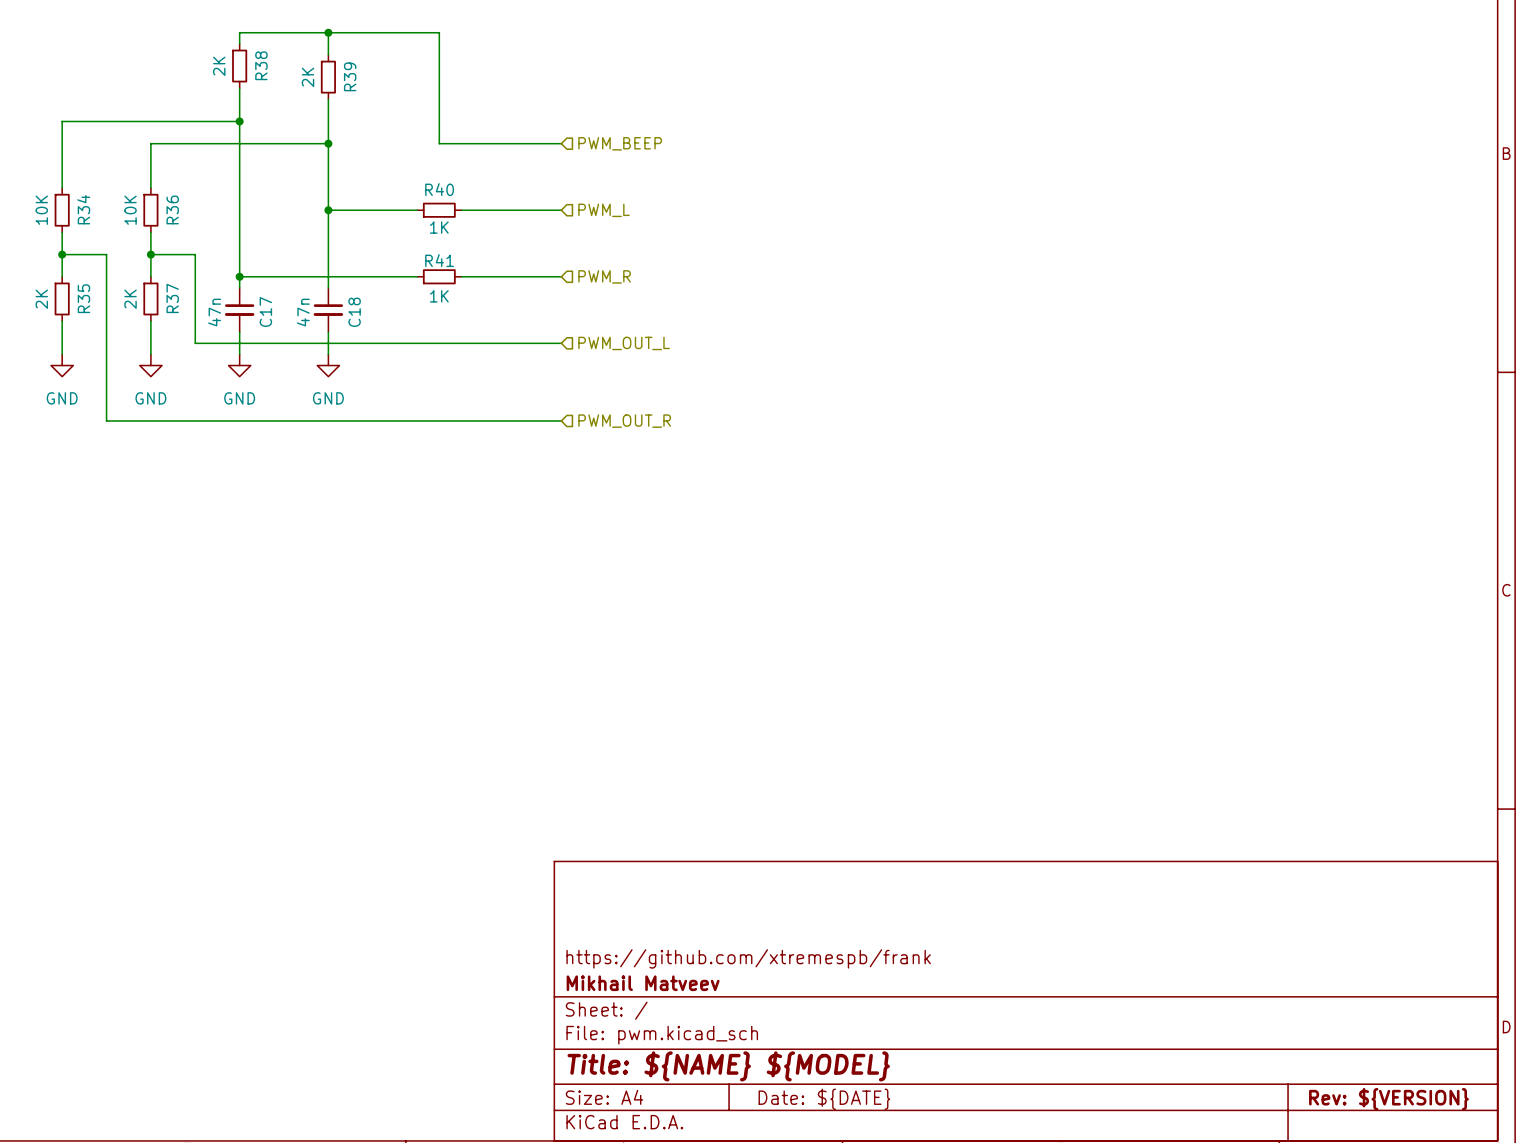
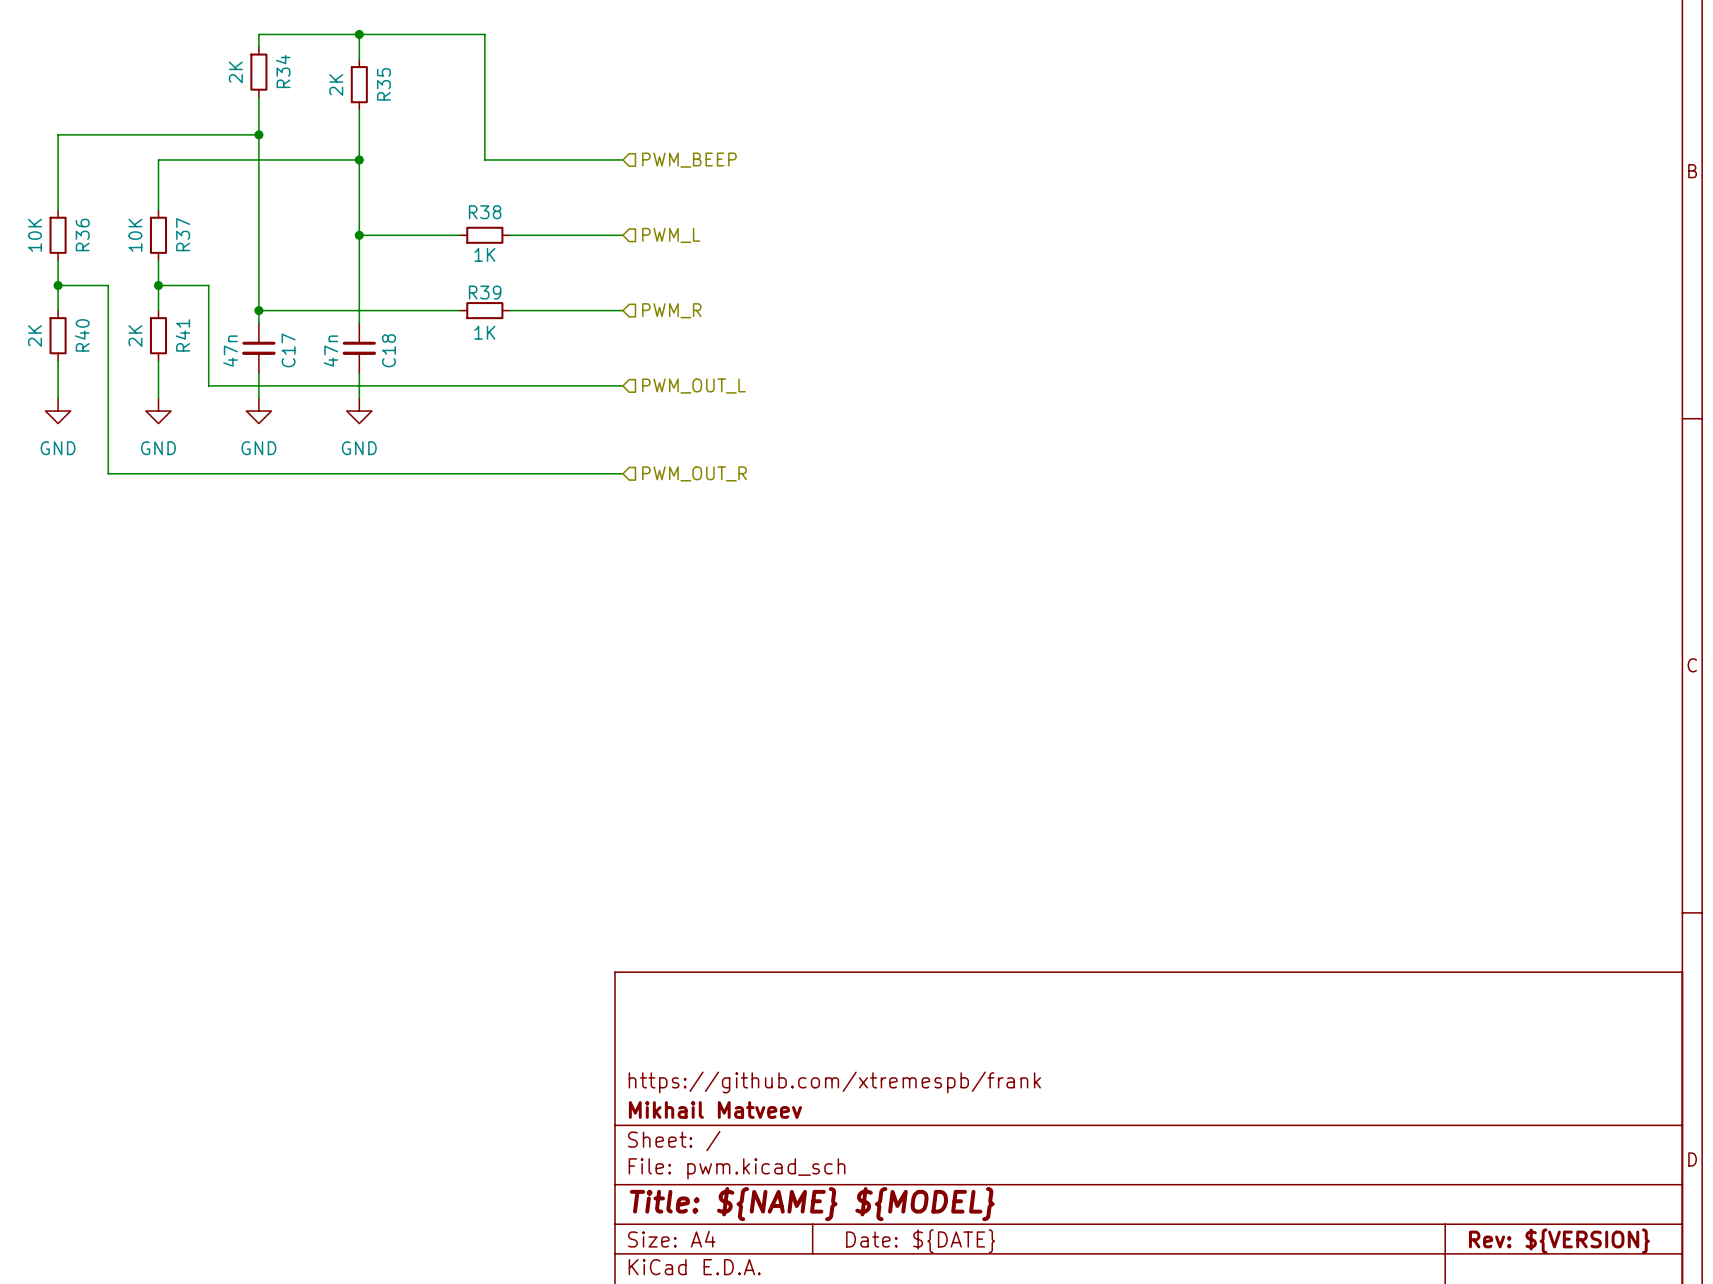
R38 name: R38 (261, 65) -> R34 (283, 71)
R39 name: R39 (350, 76) -> R35 (383, 84)
R40 name: R40 (439, 189) -> R38 (485, 212)
R34 name: R34 (83, 209) -> R36 (82, 234)
R36 name: R36 (172, 209) -> R37 (183, 234)
R41 name: R41 (439, 260) -> R39 (485, 292)
R35 name: R35 (83, 298) -> R40 (82, 335)
R37 name: R37 (172, 298) -> R41 (182, 335)

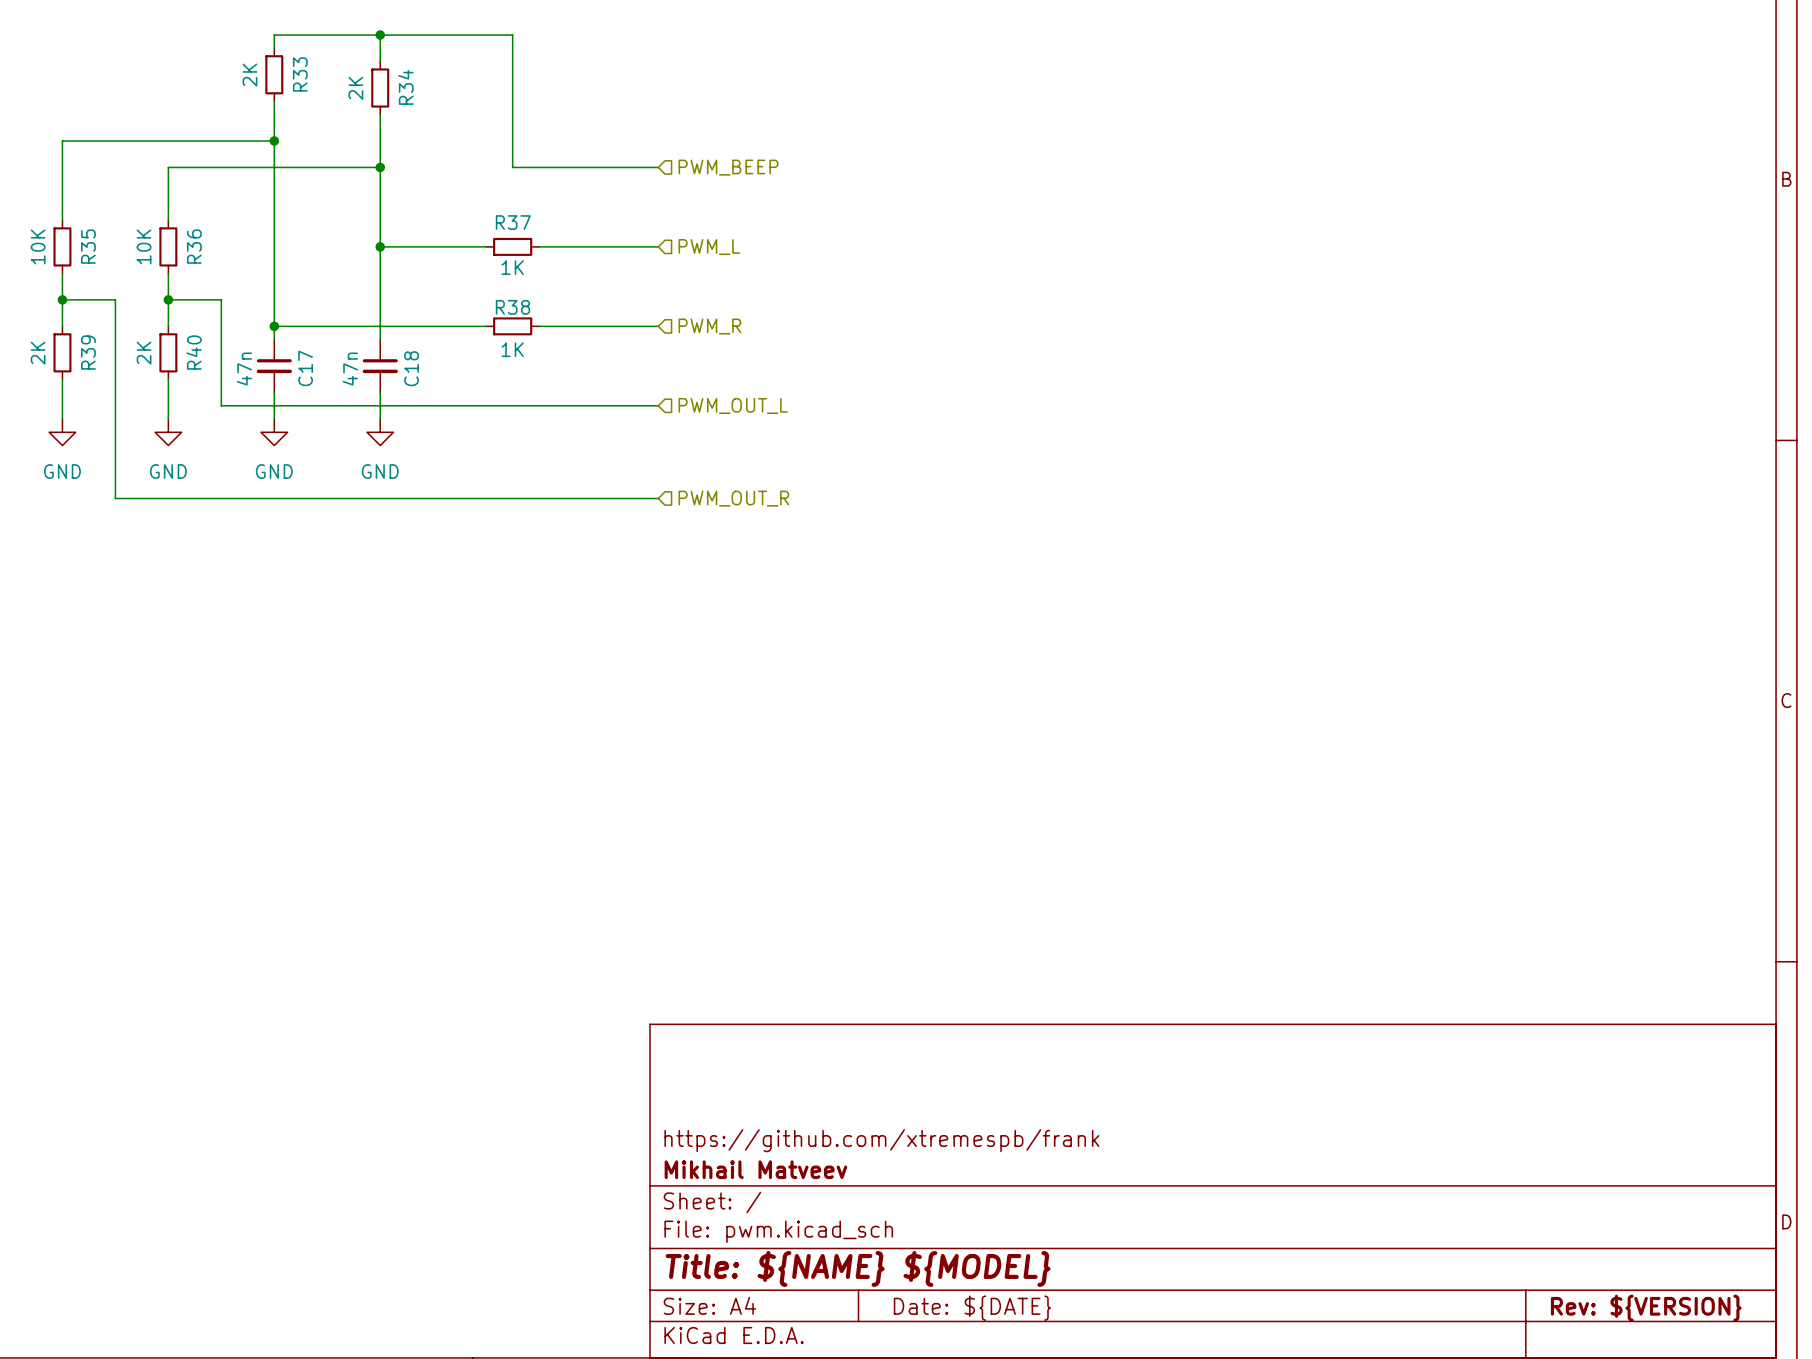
R34 name: R34 (283, 71) -> R33 (300, 74)
R35 name: R35 (383, 84) -> R34 (405, 87)
R38 name: R38 (485, 212) -> R37 (513, 222)
R36 name: R36 (82, 234) -> R35 (88, 246)
R37 name: R37 (183, 234) -> R36 (194, 246)
R39 name: R39 (485, 292) -> R38 (512, 307)
R40 name: R40 (82, 335) -> R39 (88, 352)
R41 name: R41 (182, 335) -> R40 (194, 352)

